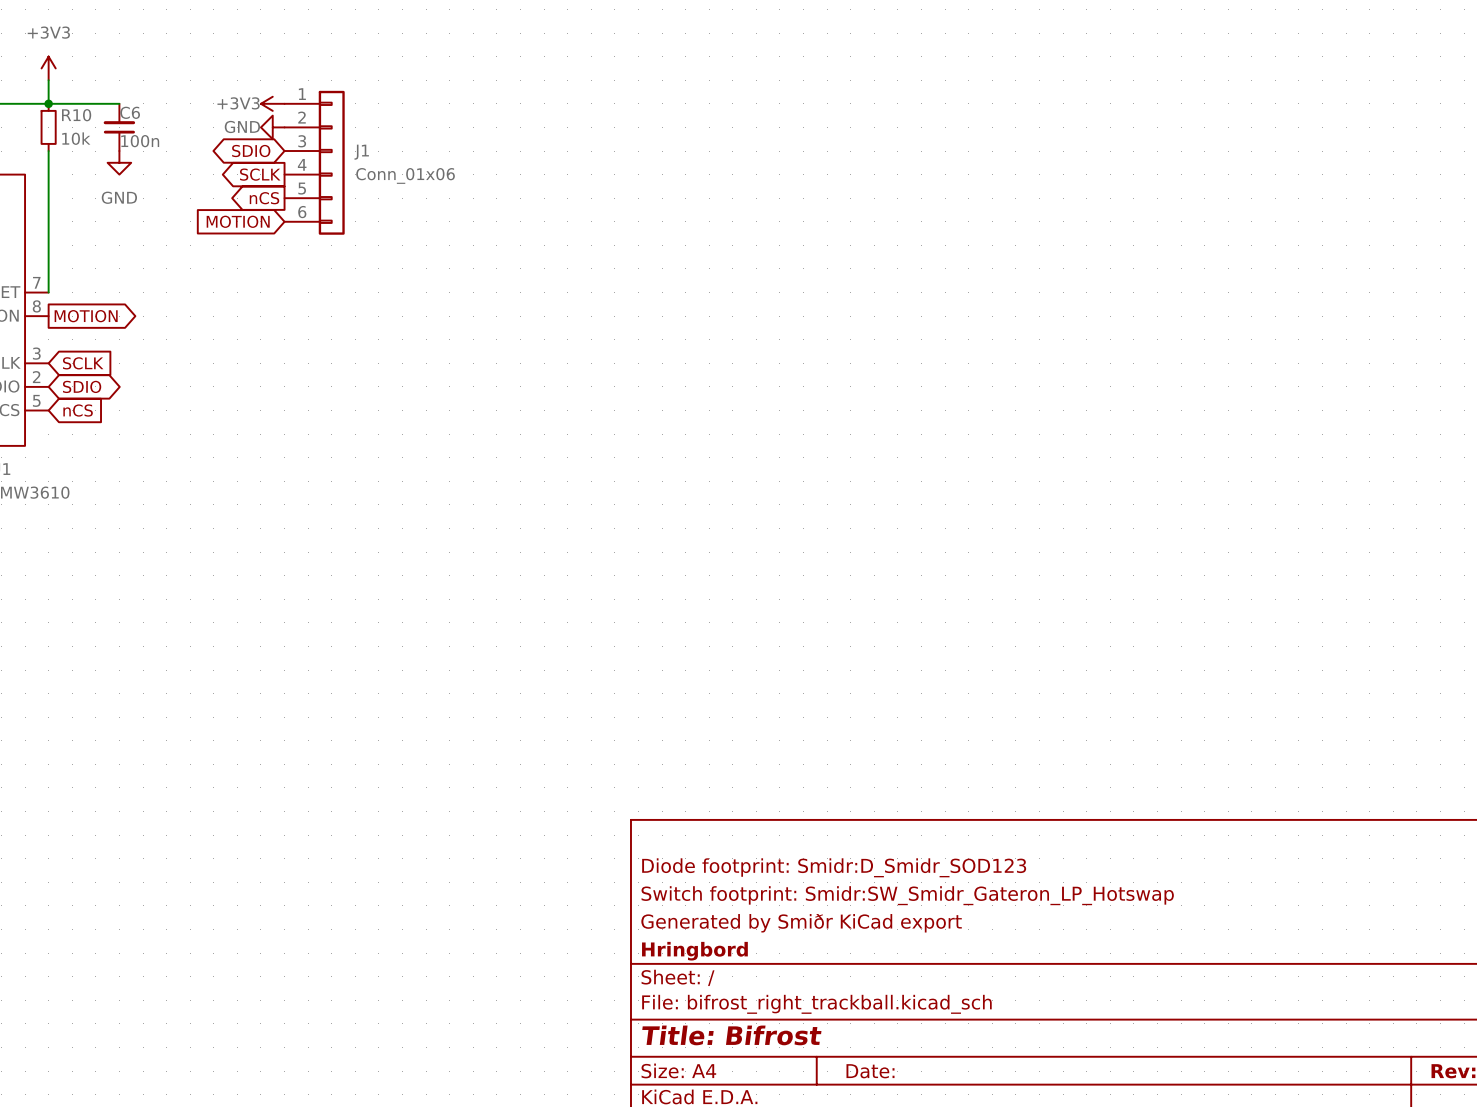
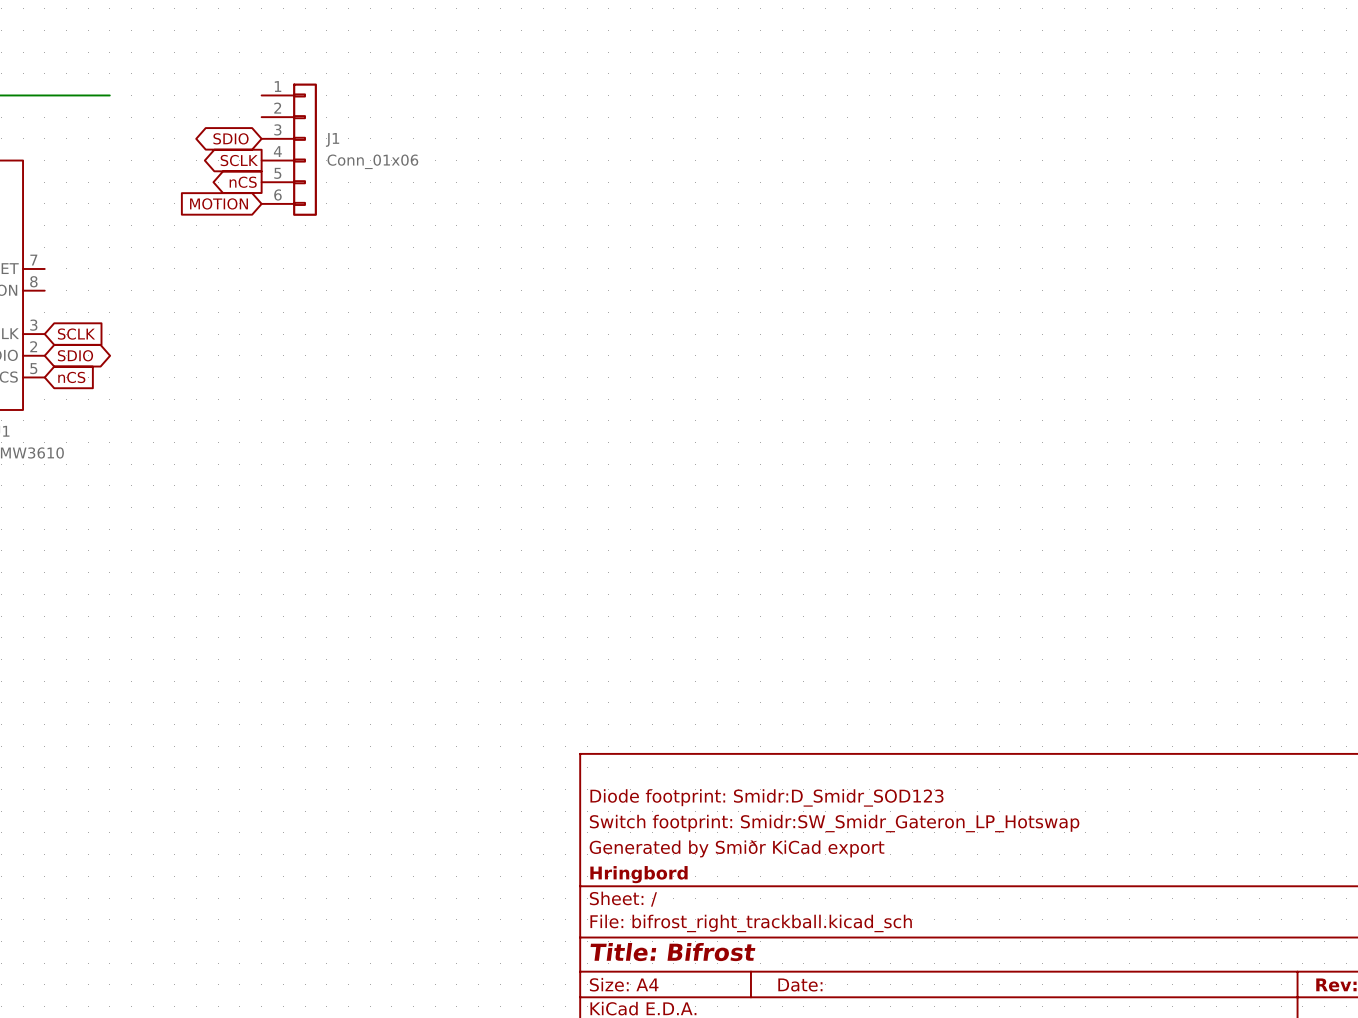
power symbol: +3V3 (48, 68) -> none
wire: (48, 80) (48, 103) -> none
junction: (48, 103) -> none
power symbol: +3V3 (272, 103) -> none
R10: 10k (48, 127) -> none
C6: 100n (119, 127) -> none
power symbol: GND (272, 127) -> none
wire: (48, 151) (48, 292) -> none
power symbol: GND (119, 162) -> none
global label: MOTION (86, 316) -> none

